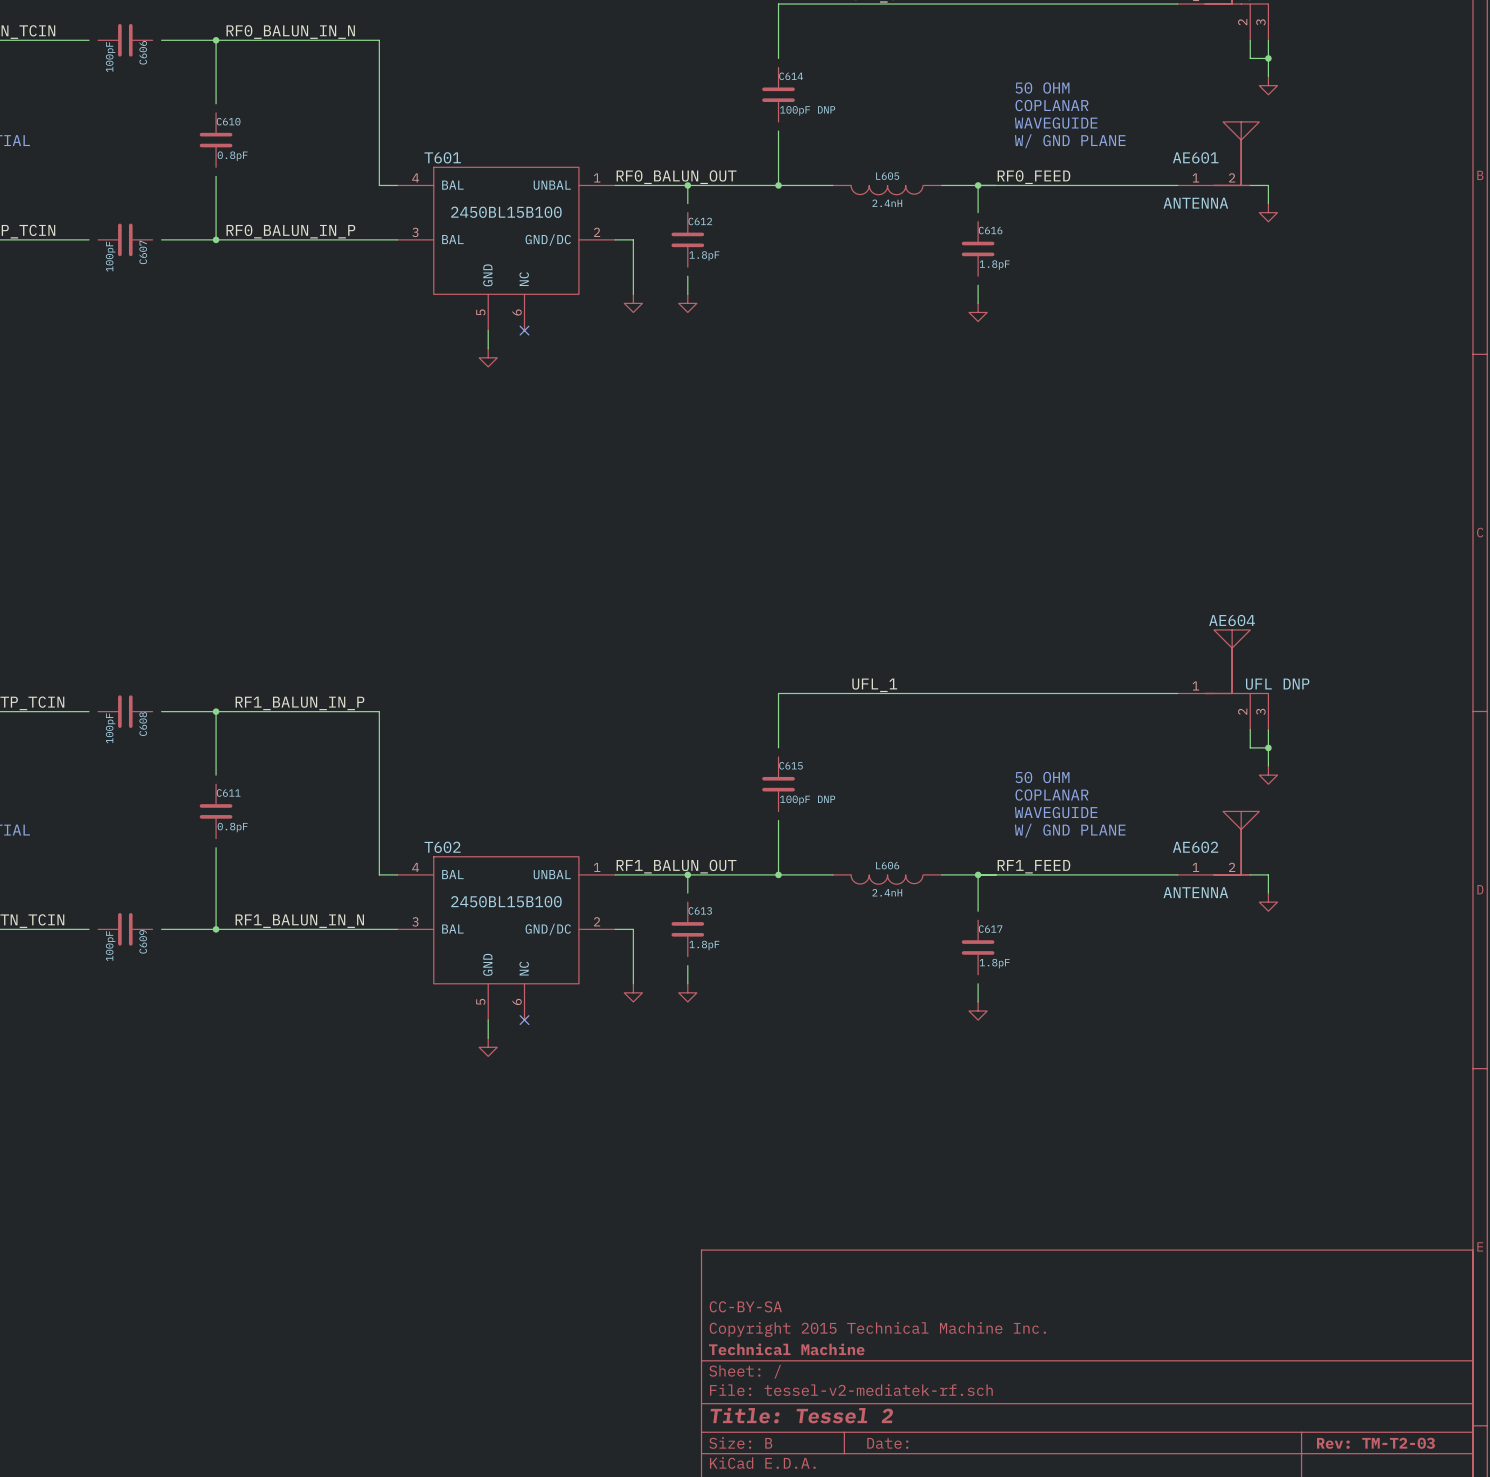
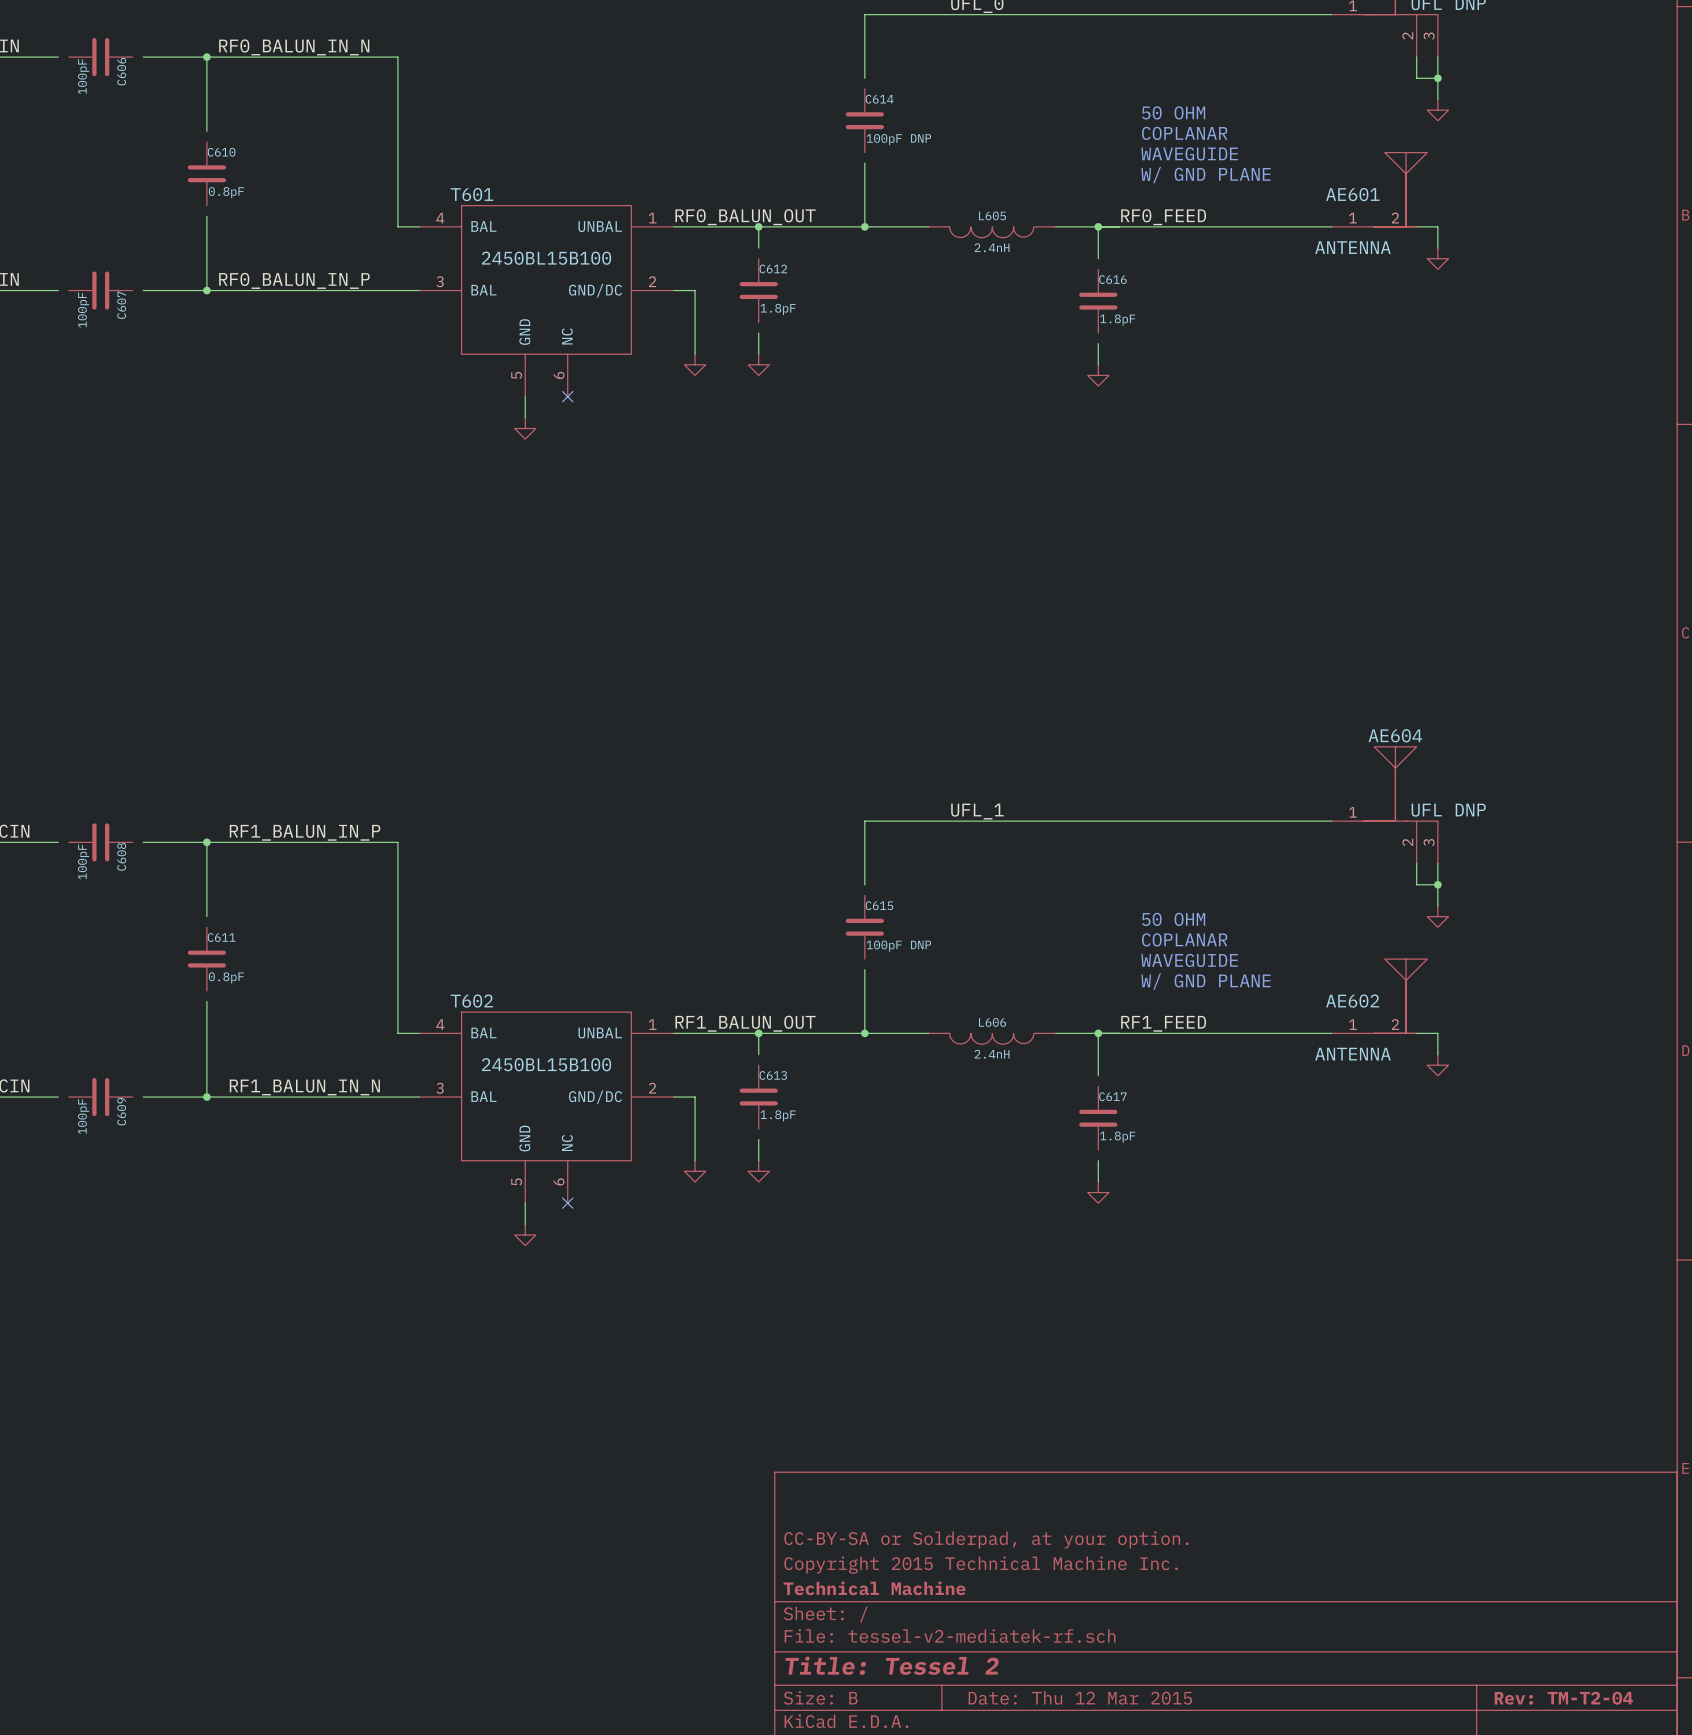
title block: CC-BY-SA (745, 1306) -> CC-BY-SA or Solderpad, at your option. (986, 1539)
title block: Date: (887, 1443) -> Date: Thu 12 Mar 2015 (1080, 1697)
title block: Rev: TM-T2-03 (1375, 1443) -> Rev: TM-T2-04 (1563, 1698)

